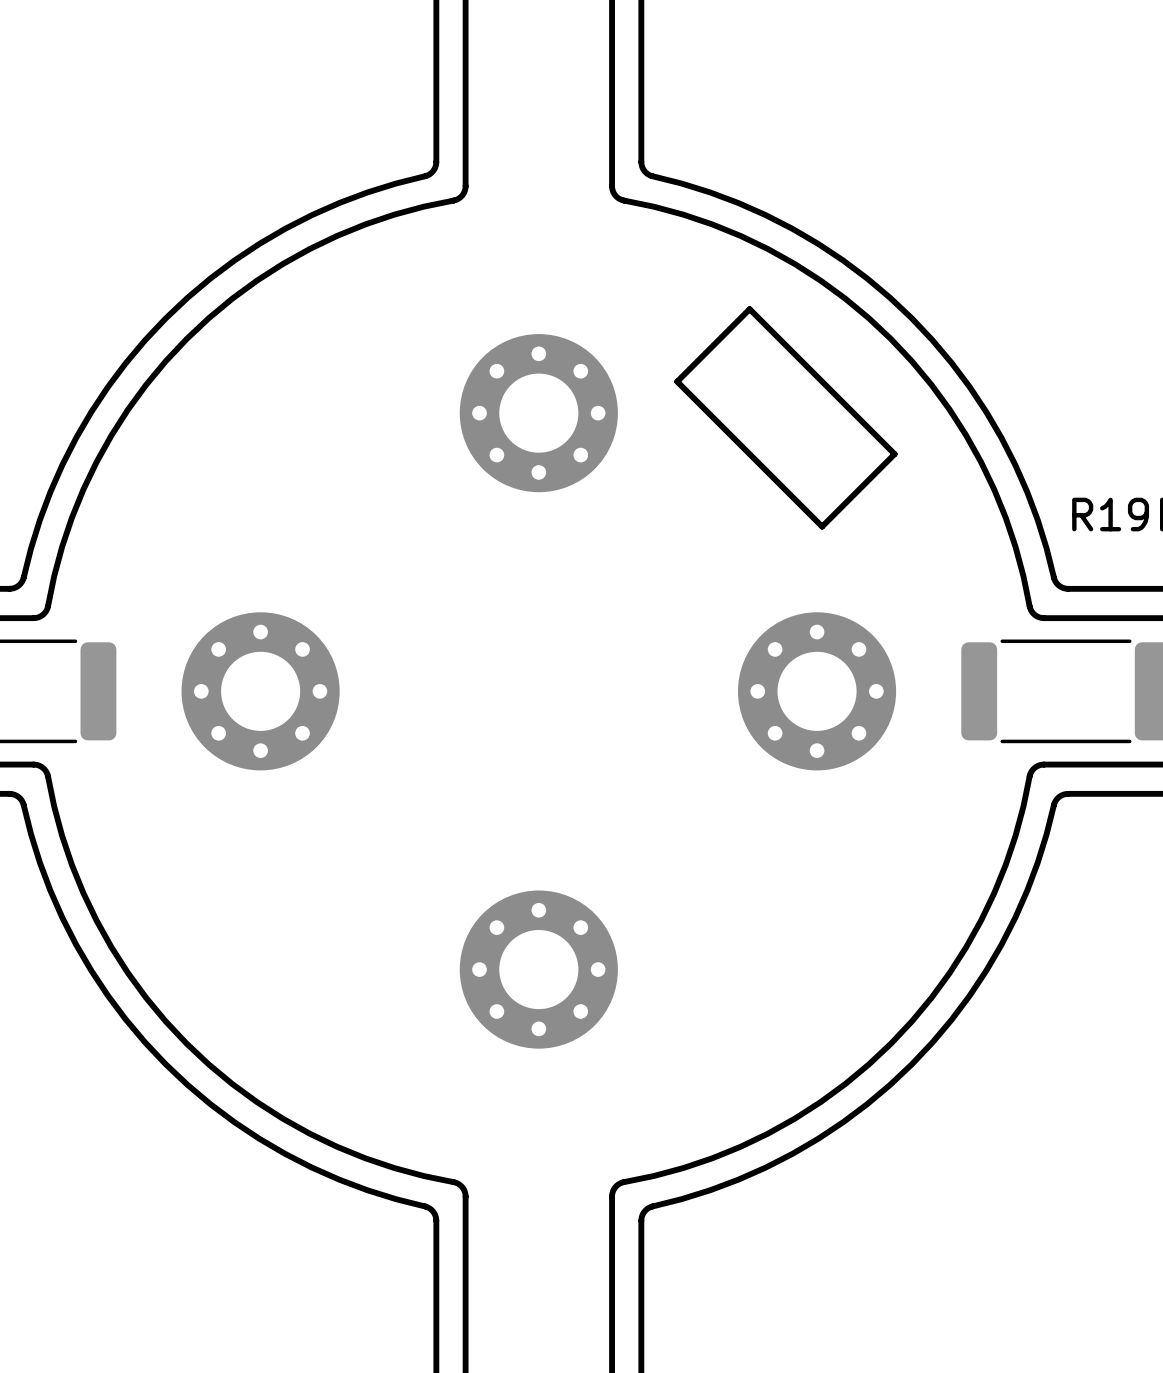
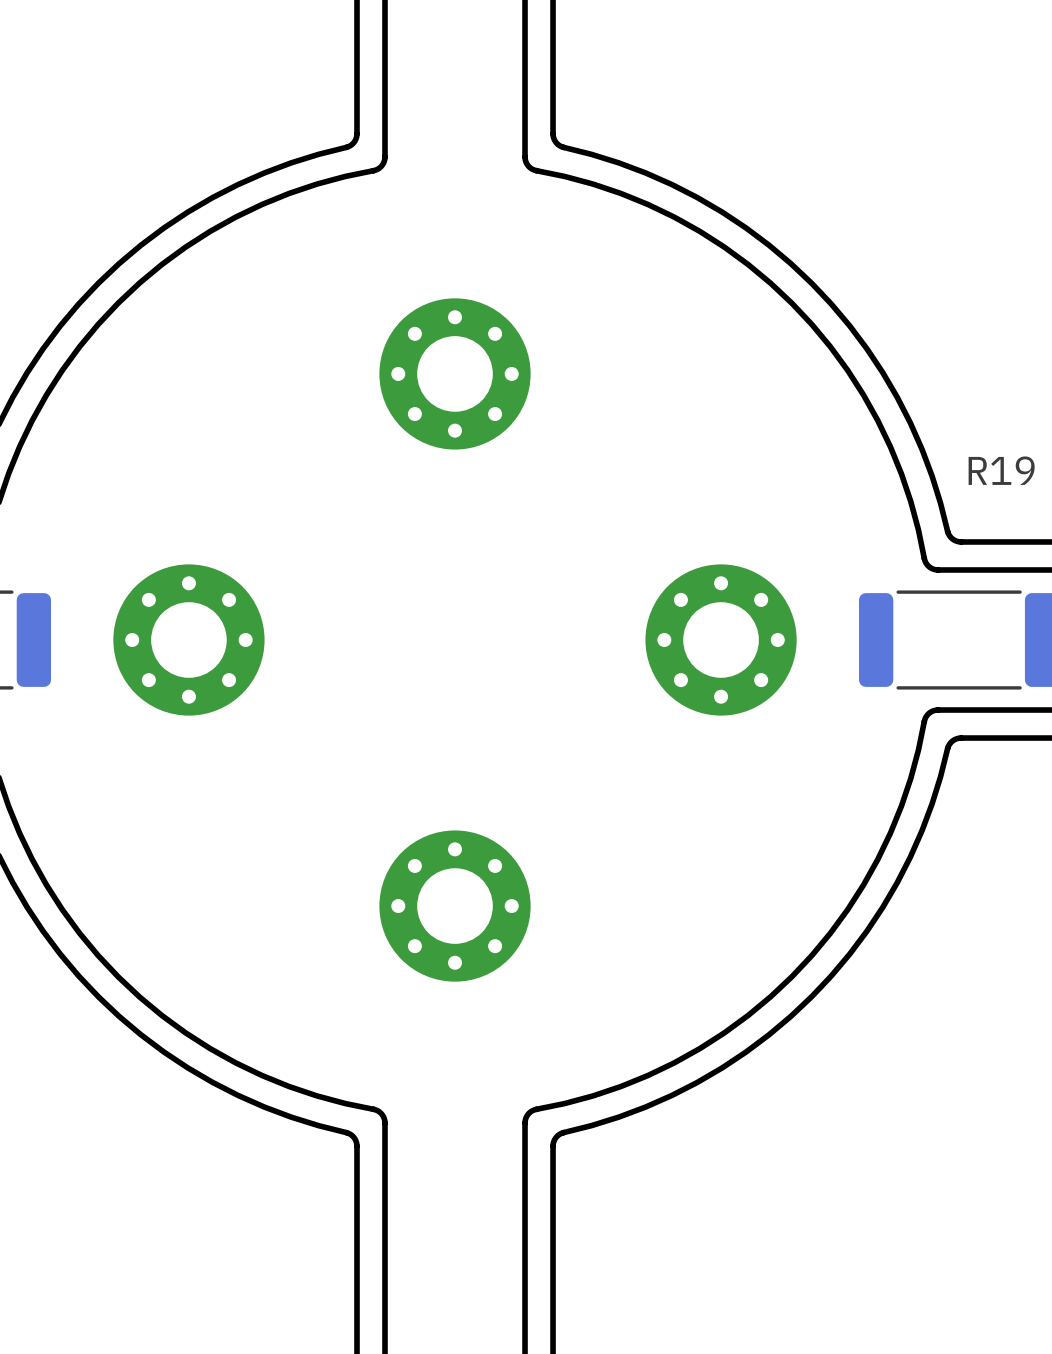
board edge: (749, 309) (894, 454) (822, 526) (677, 381) (749, 309) -> none

